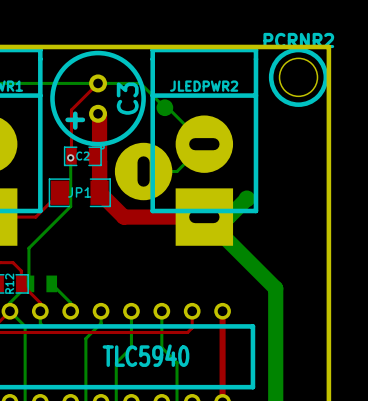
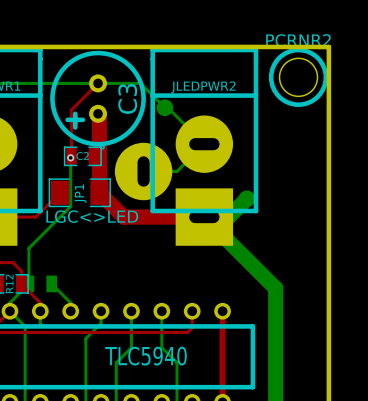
JP1 name rotation: 0° (79, 192) -> 90° counterclockwise (80, 193)
text: none -> LGC<>LED (92, 216)

